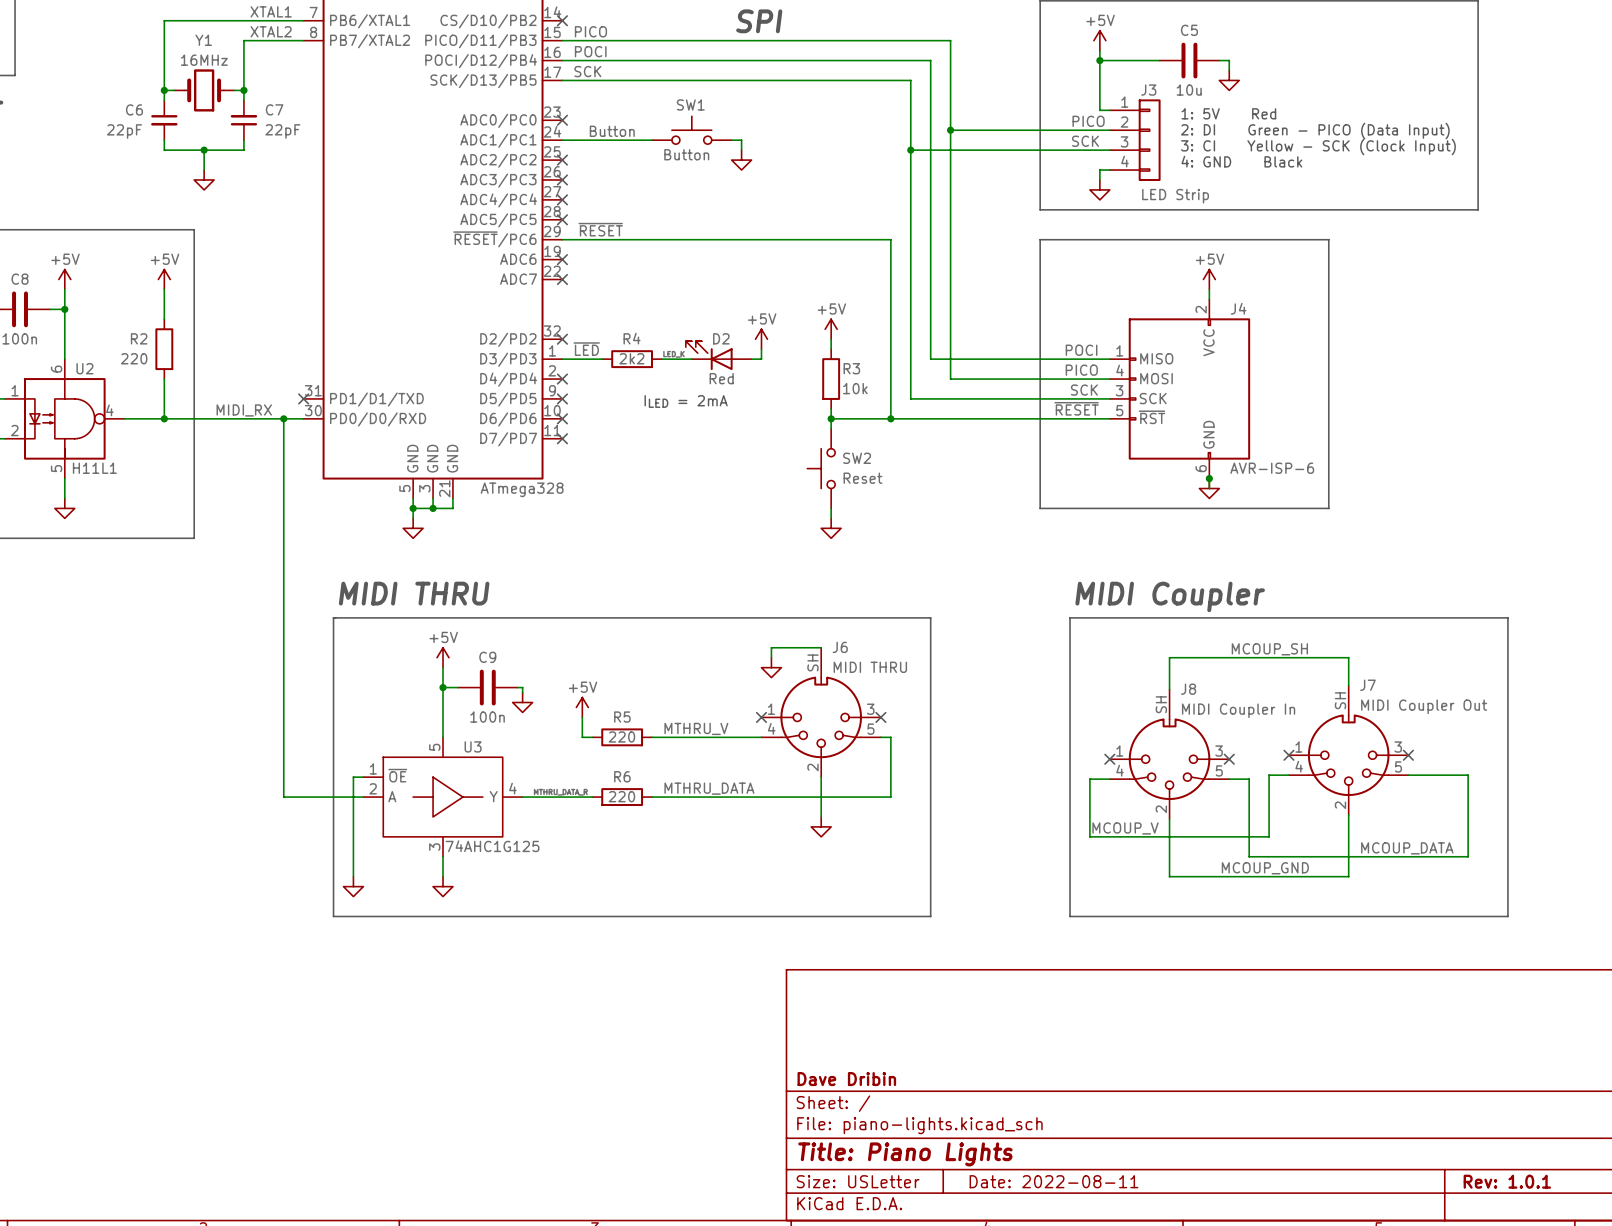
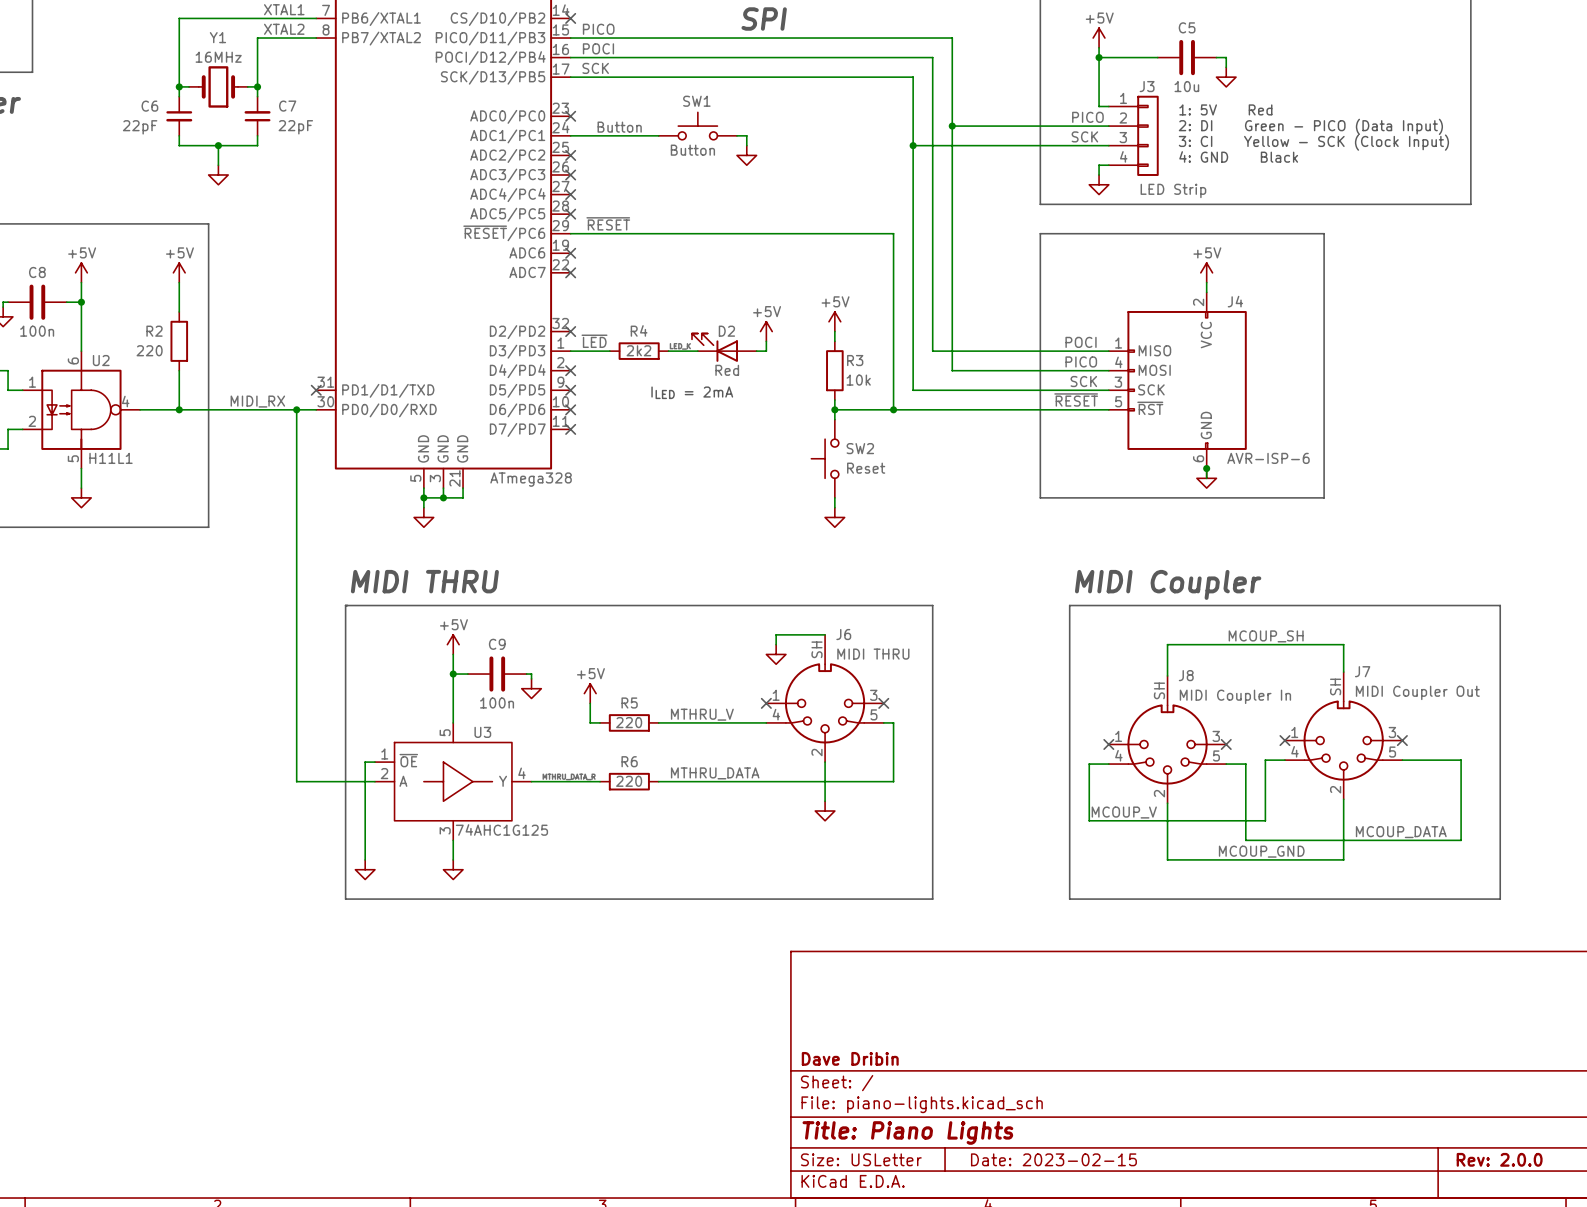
title block: Date: 2022-08-11 (1054, 1181) -> Date: 2023-02-15 (1053, 1159)
title block: Rev: 1.0.1 (1507, 1181) -> Rev: 2.0.0 (1499, 1159)

